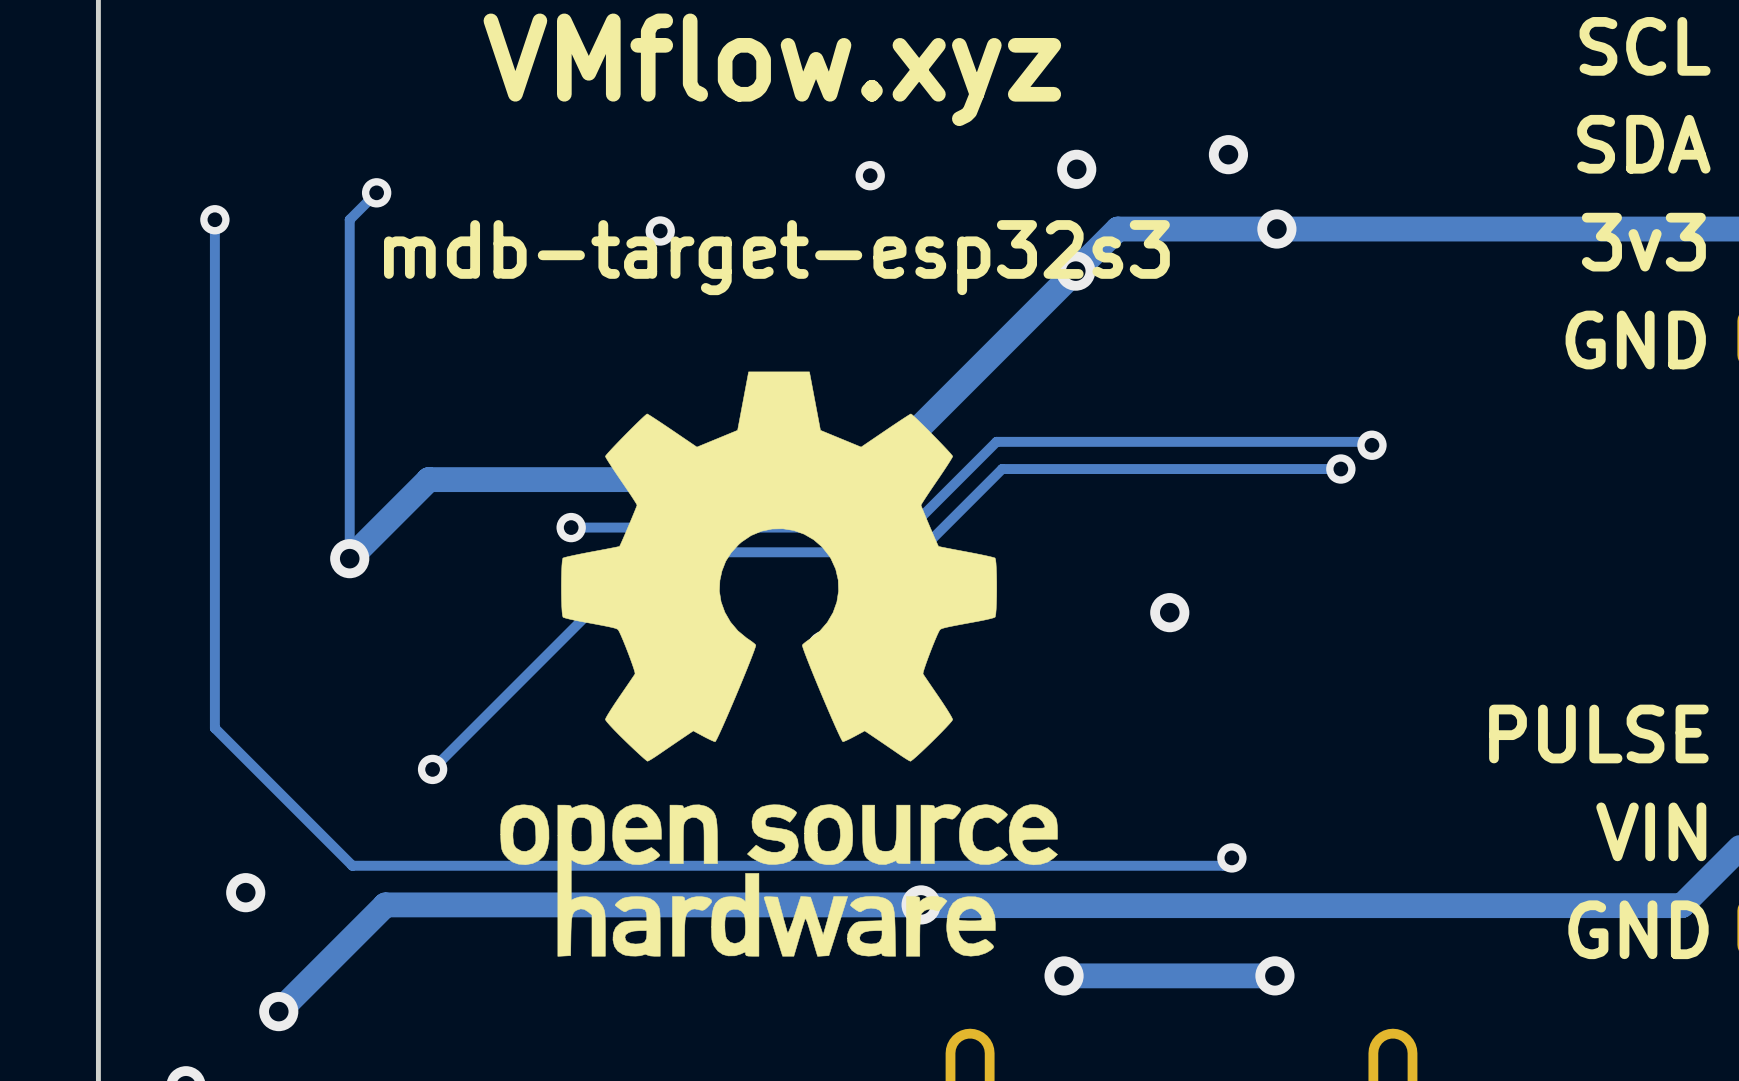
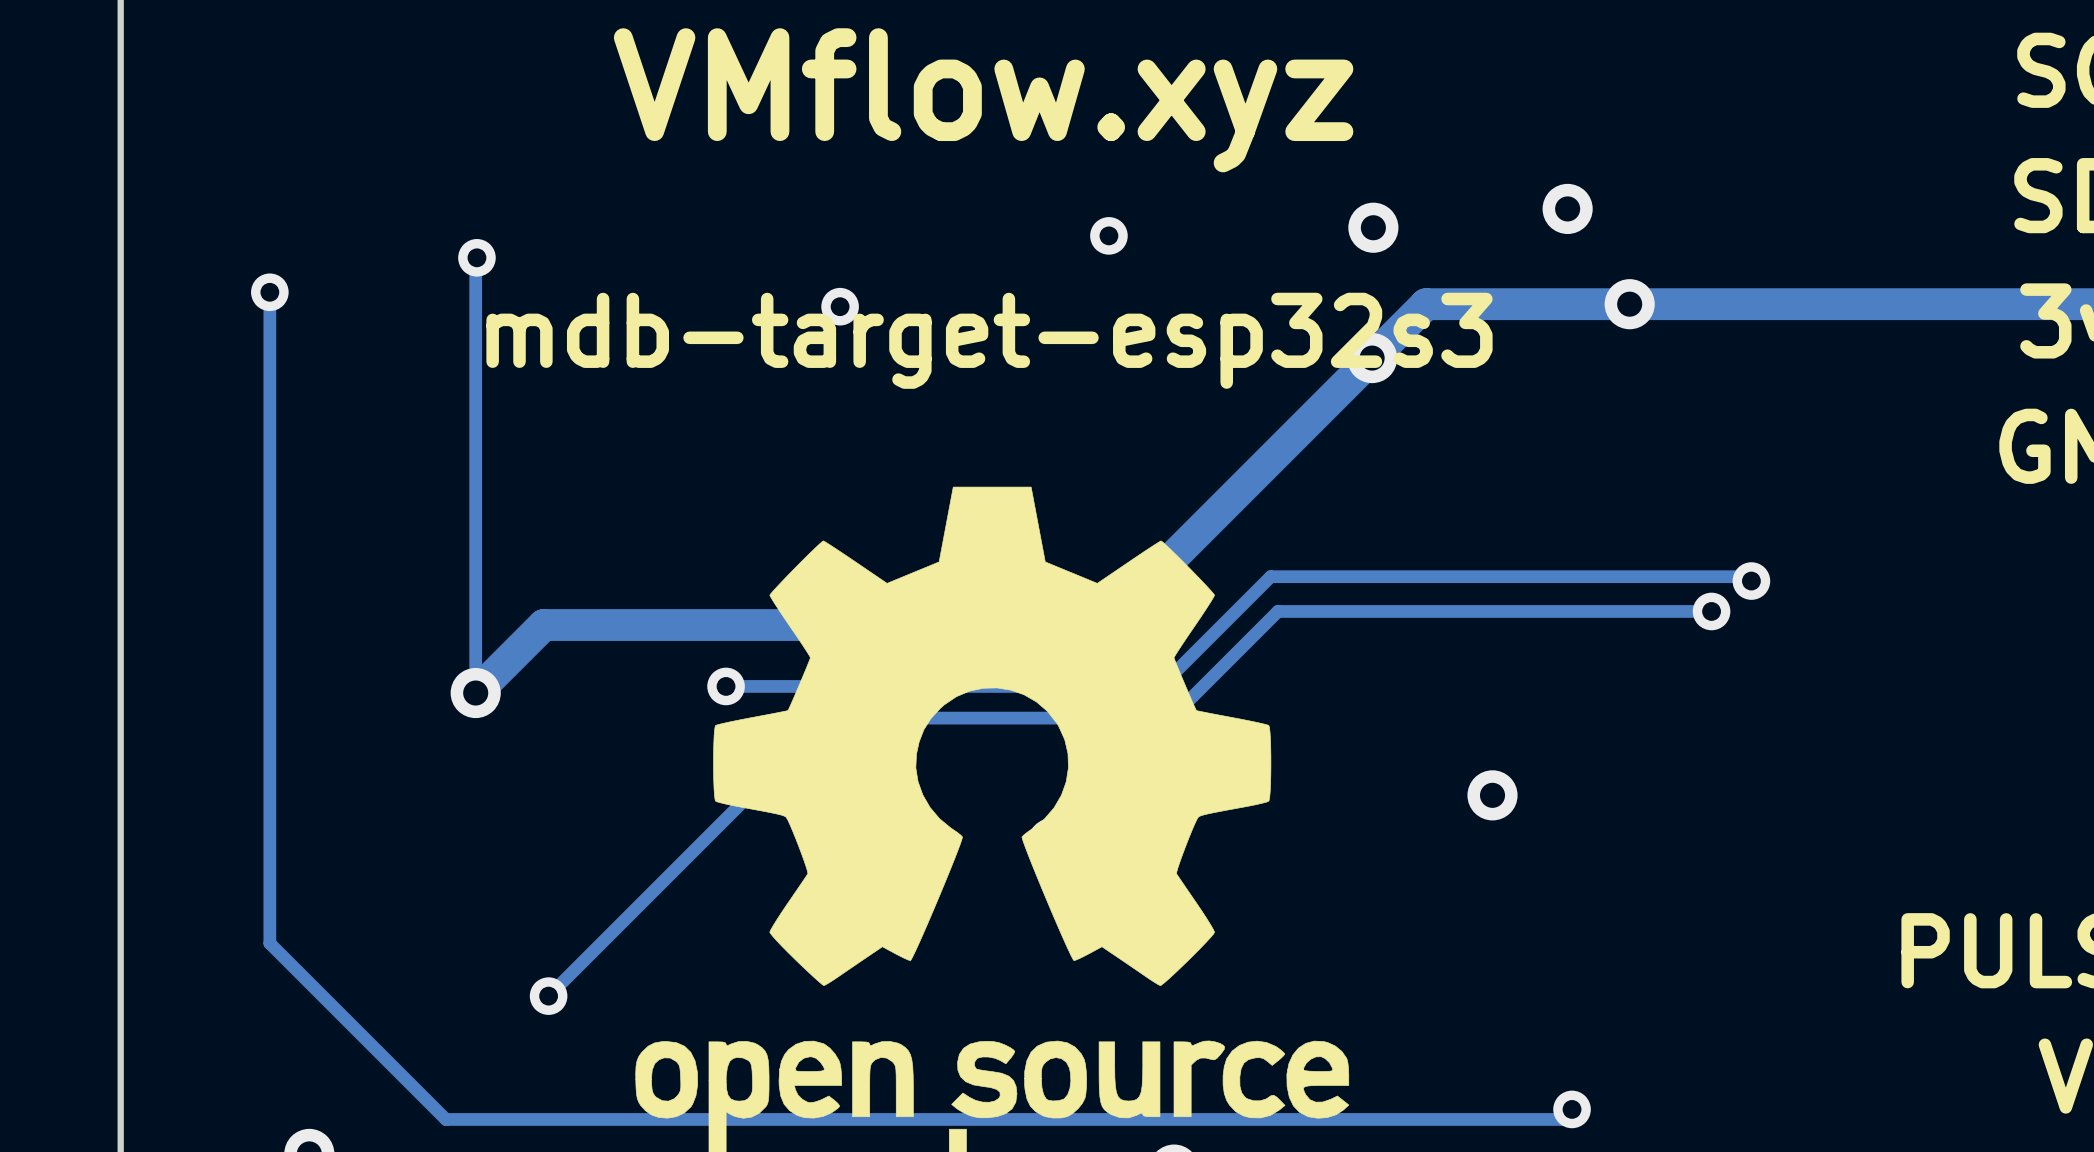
track: (375, 193) (349, 219) (349, 558) (375, 532) -> (475, 259) (475, 693)
via position: (349, 558) -> (475, 693)

